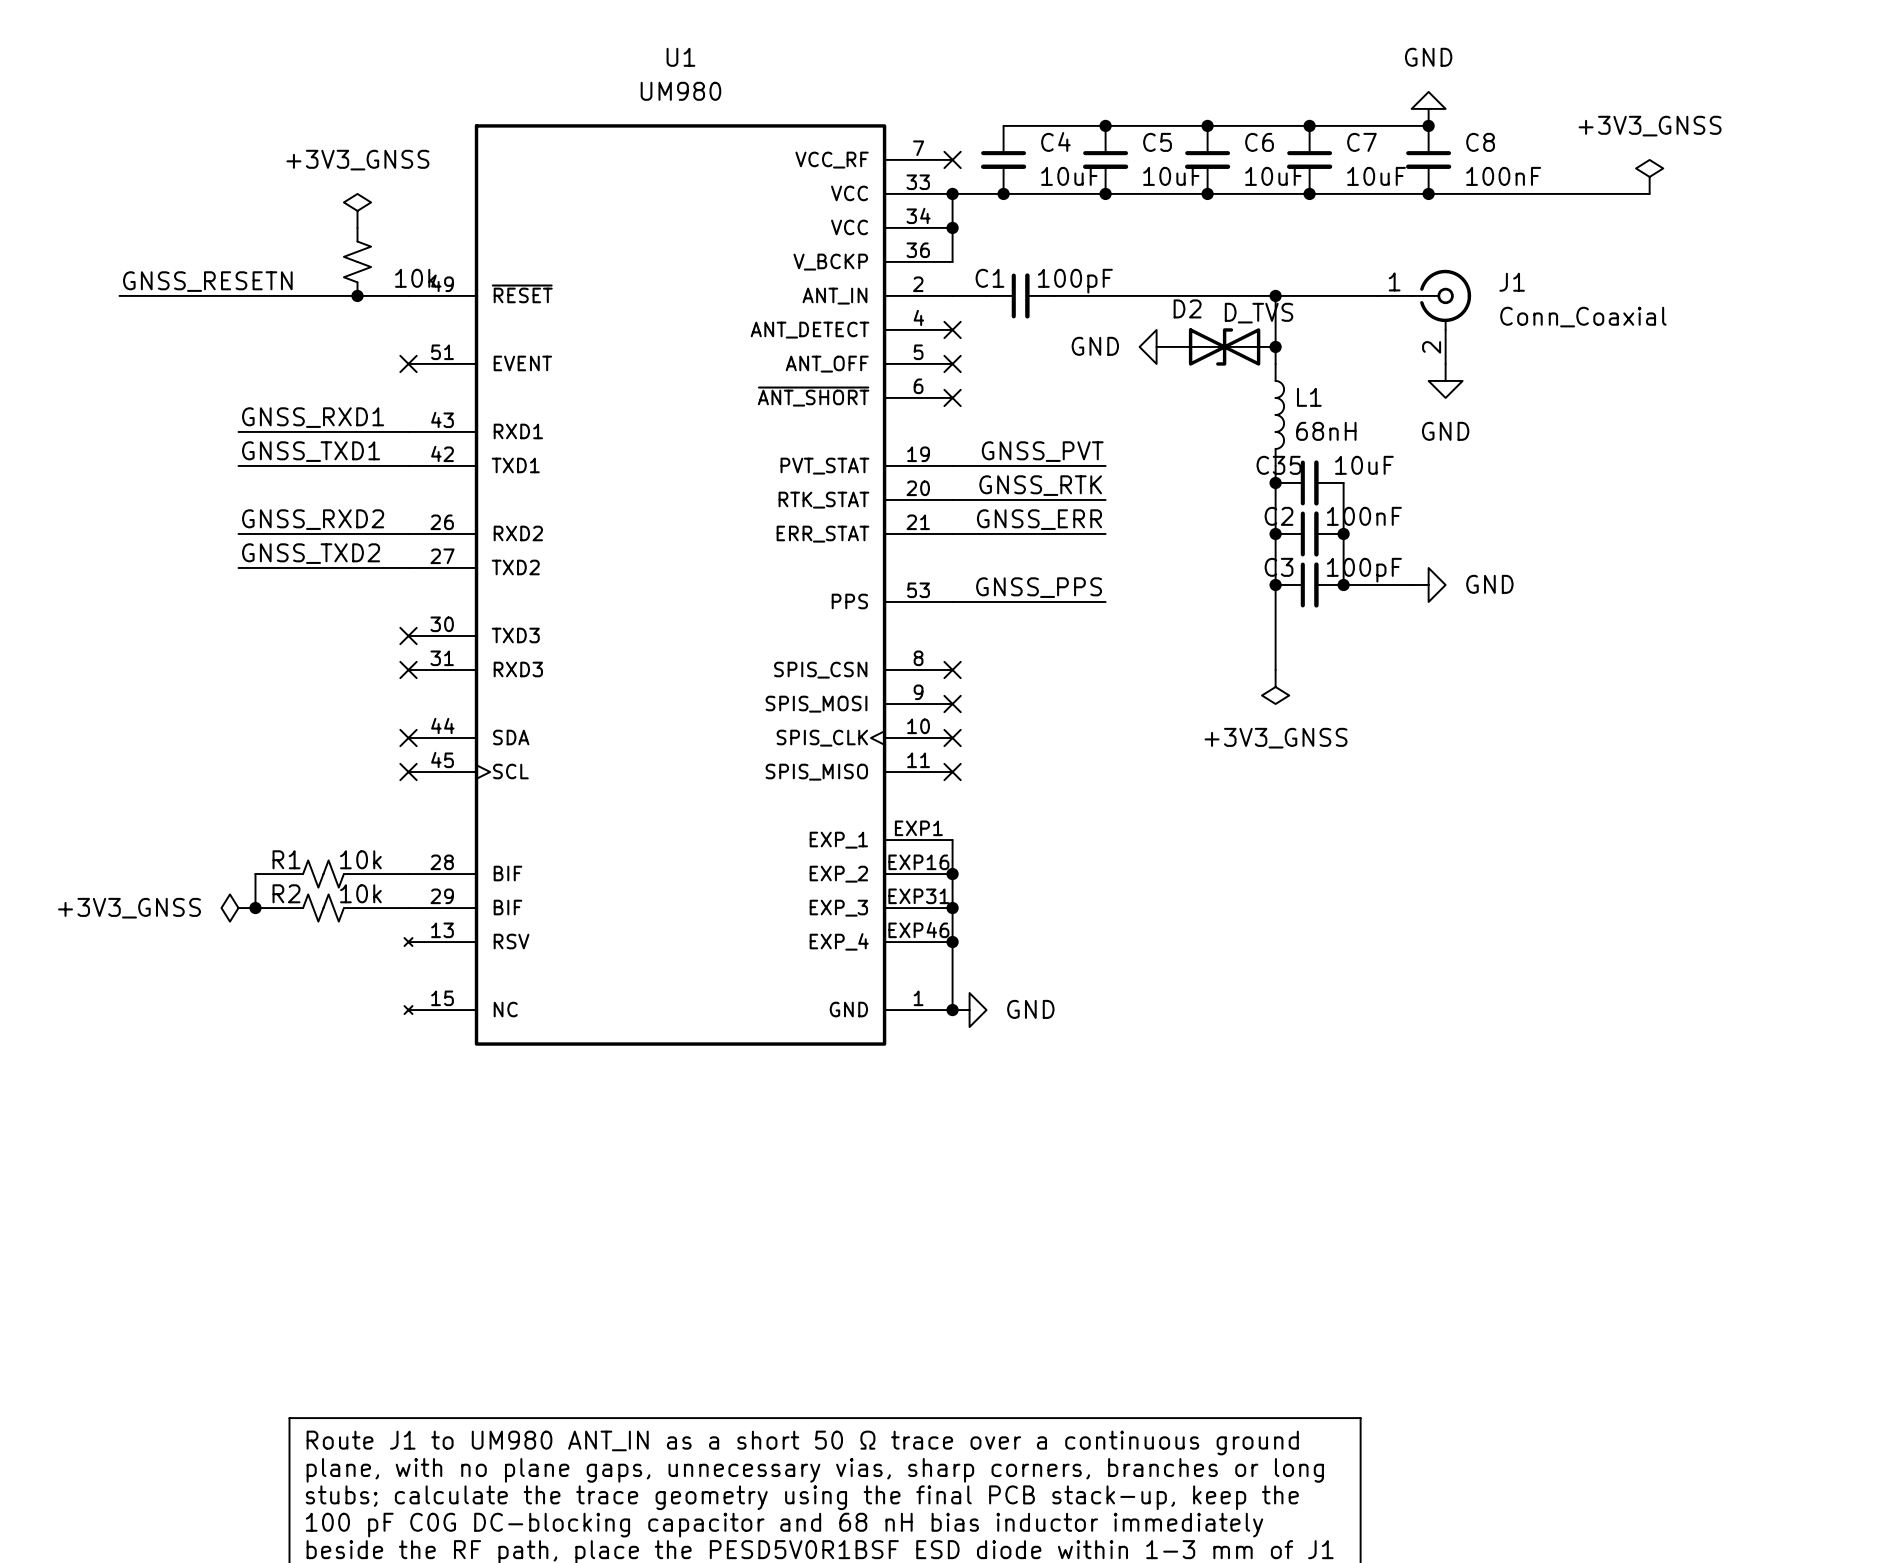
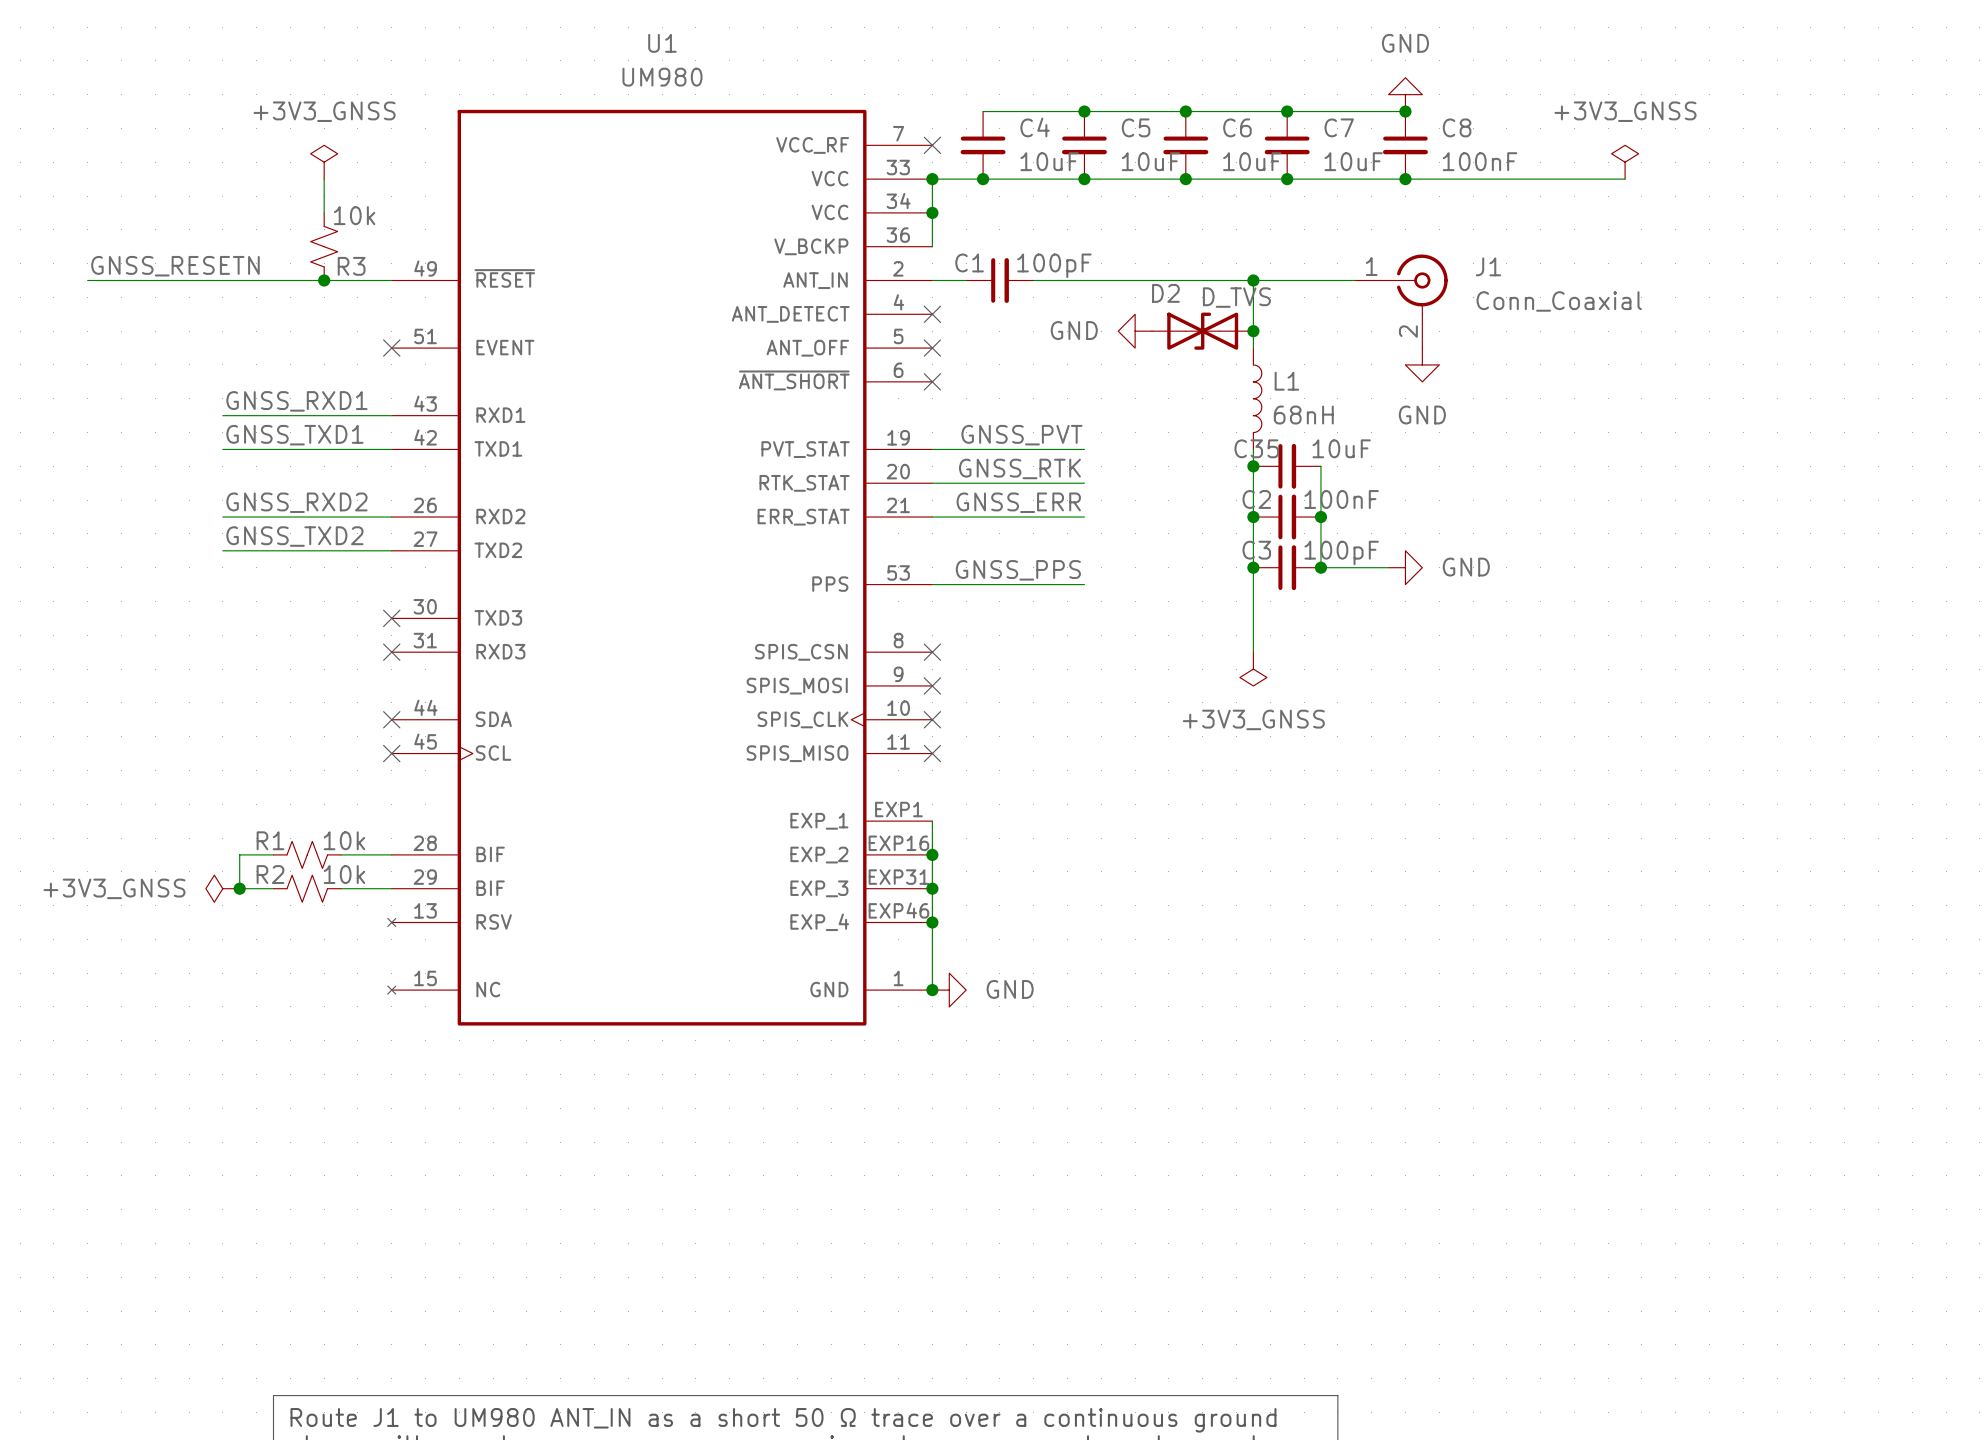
wire: none -> (324, 179) (324, 212)
power symbol position: +3V3_GNSS (357, 210) -> +3V3_GNSS (324, 162)
R3: none -> 10k (324, 246)
part: 10k (357, 261) -> none
label position: GNSS_RESETN (207, 281) -> GNSS_RESETN (175, 266)
wire: none -> (87, 280) (104, 280)
junction position: (357, 295) -> (324, 280)

